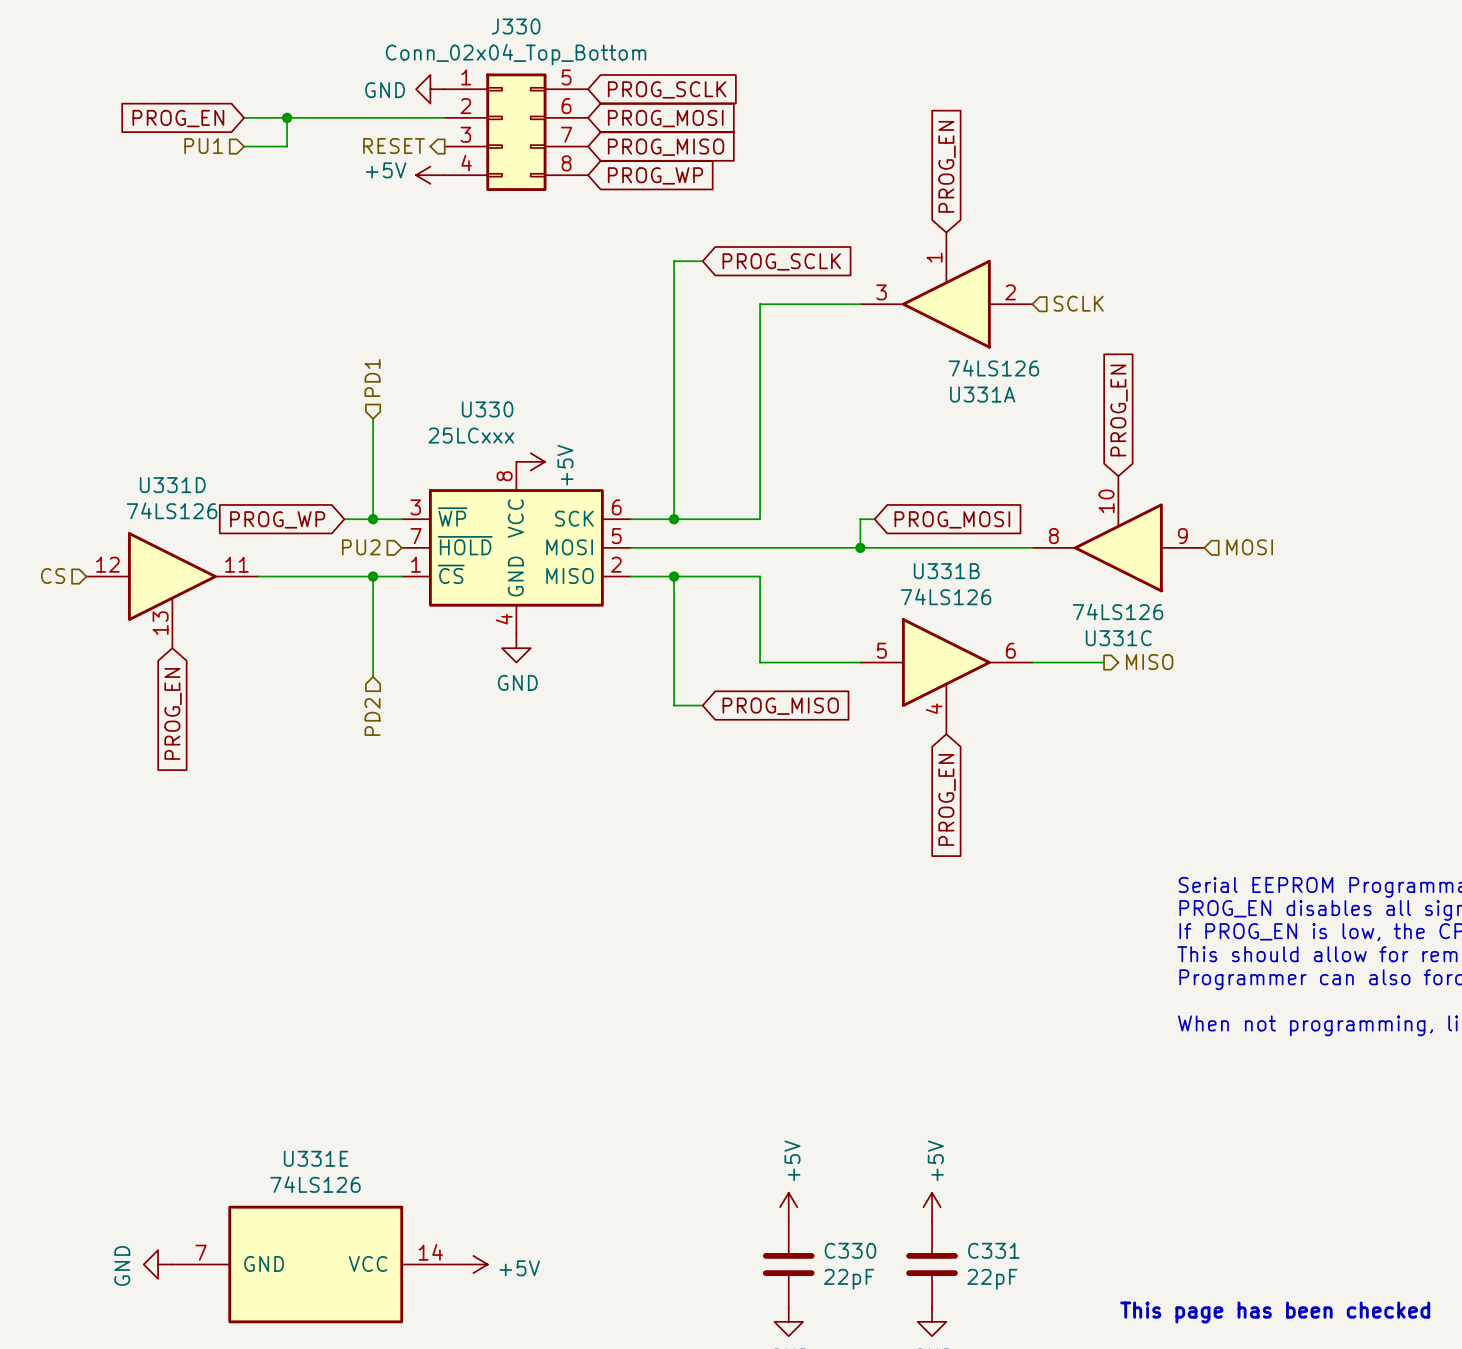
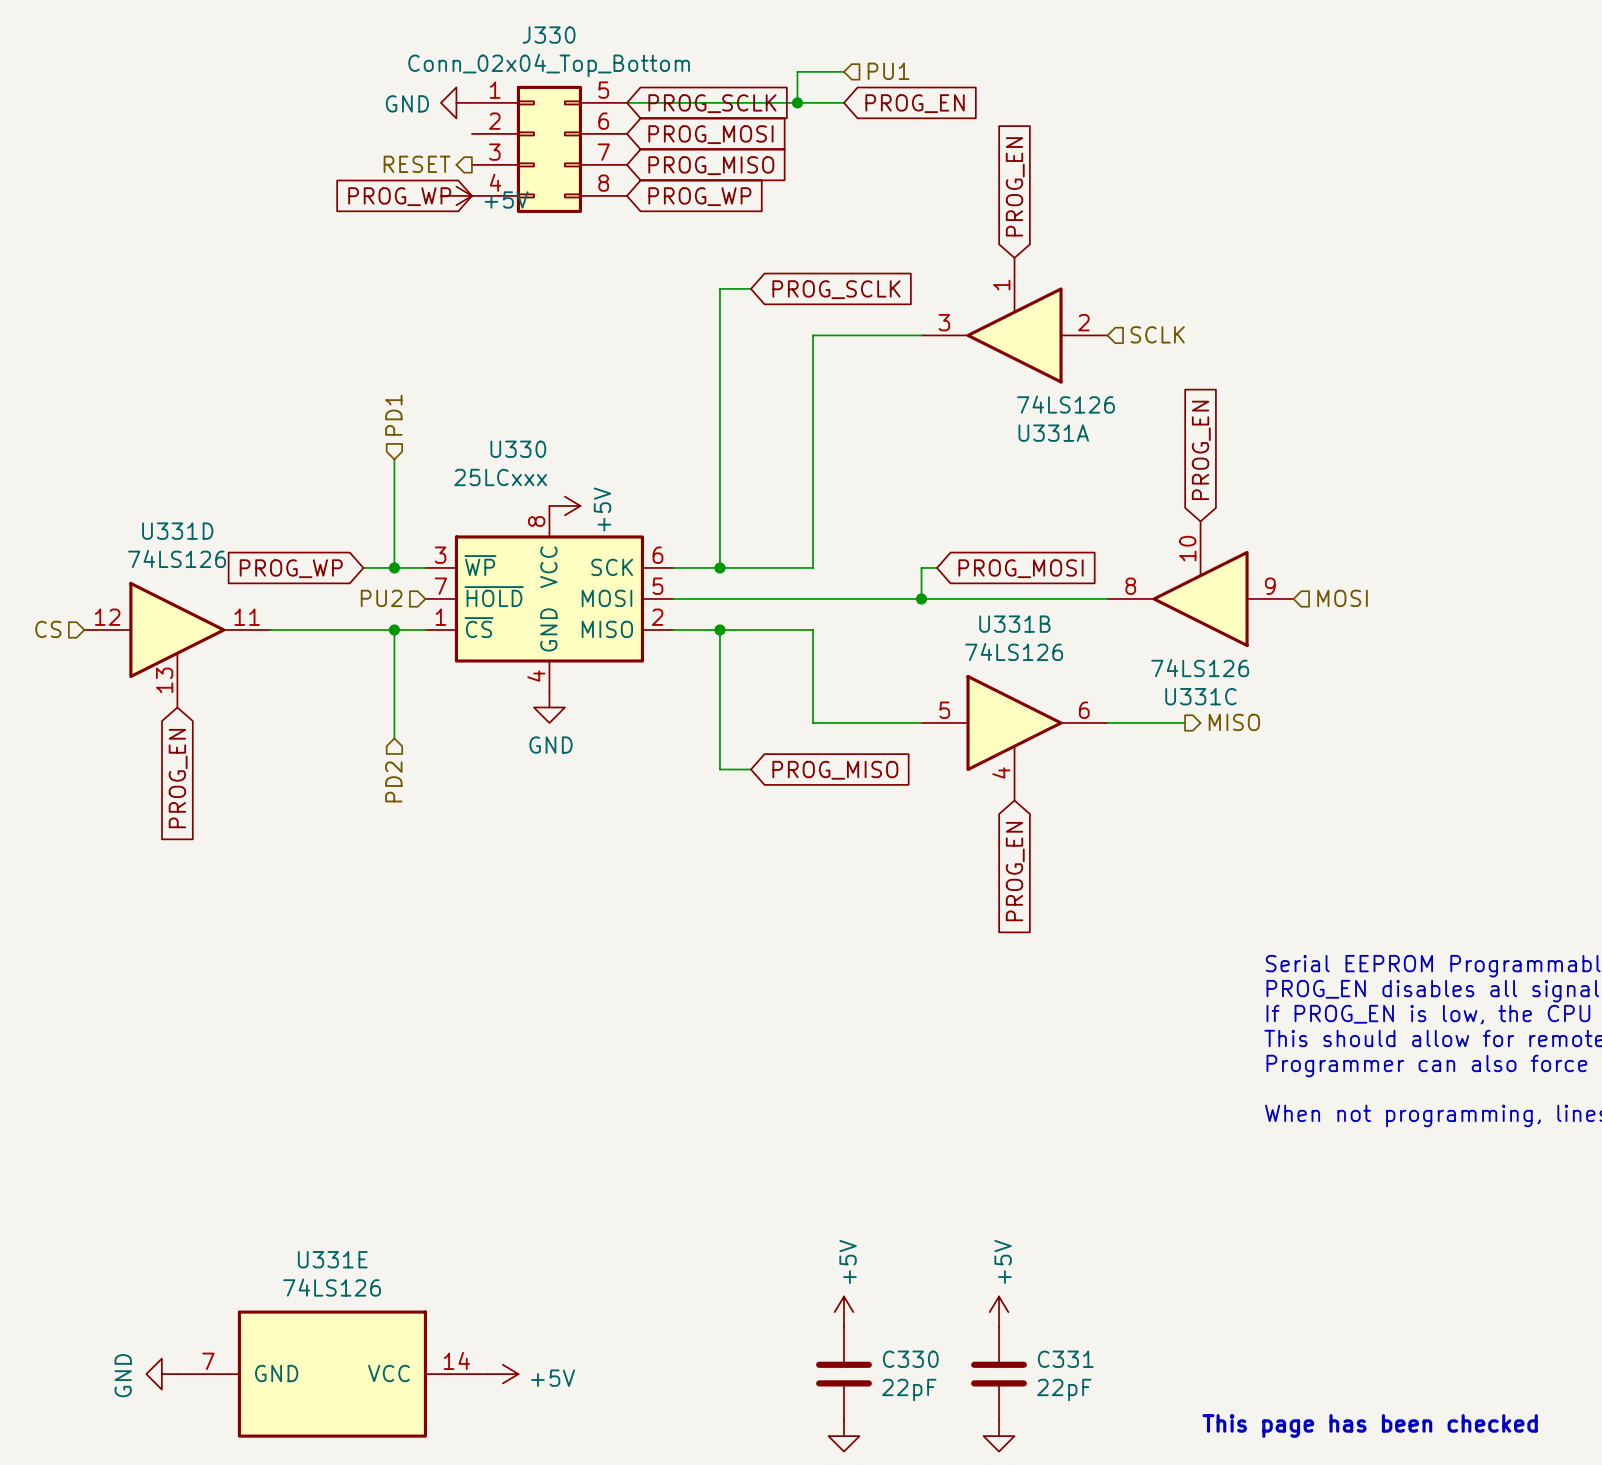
wire: none -> (843, 71) (797, 71) (797, 102)
hierarchical label: none -> PU1 (888, 71)
wire: none -> (626, 102) (843, 102)
junction: none -> (797, 102)
global label: none -> PROG_EN (915, 103)
wire: (244, 117) (444, 117) -> none
wire: (287, 117) (287, 146) (244, 146) -> none
junction: (287, 117) -> none
global label: PROG_EN (178, 118) -> none
hierarchical label: PU1 (203, 146) -> none
global label: none -> PROG_WP (399, 196)
power symbol rotation: 0° (430, 175) -> 180° (456, 195)

